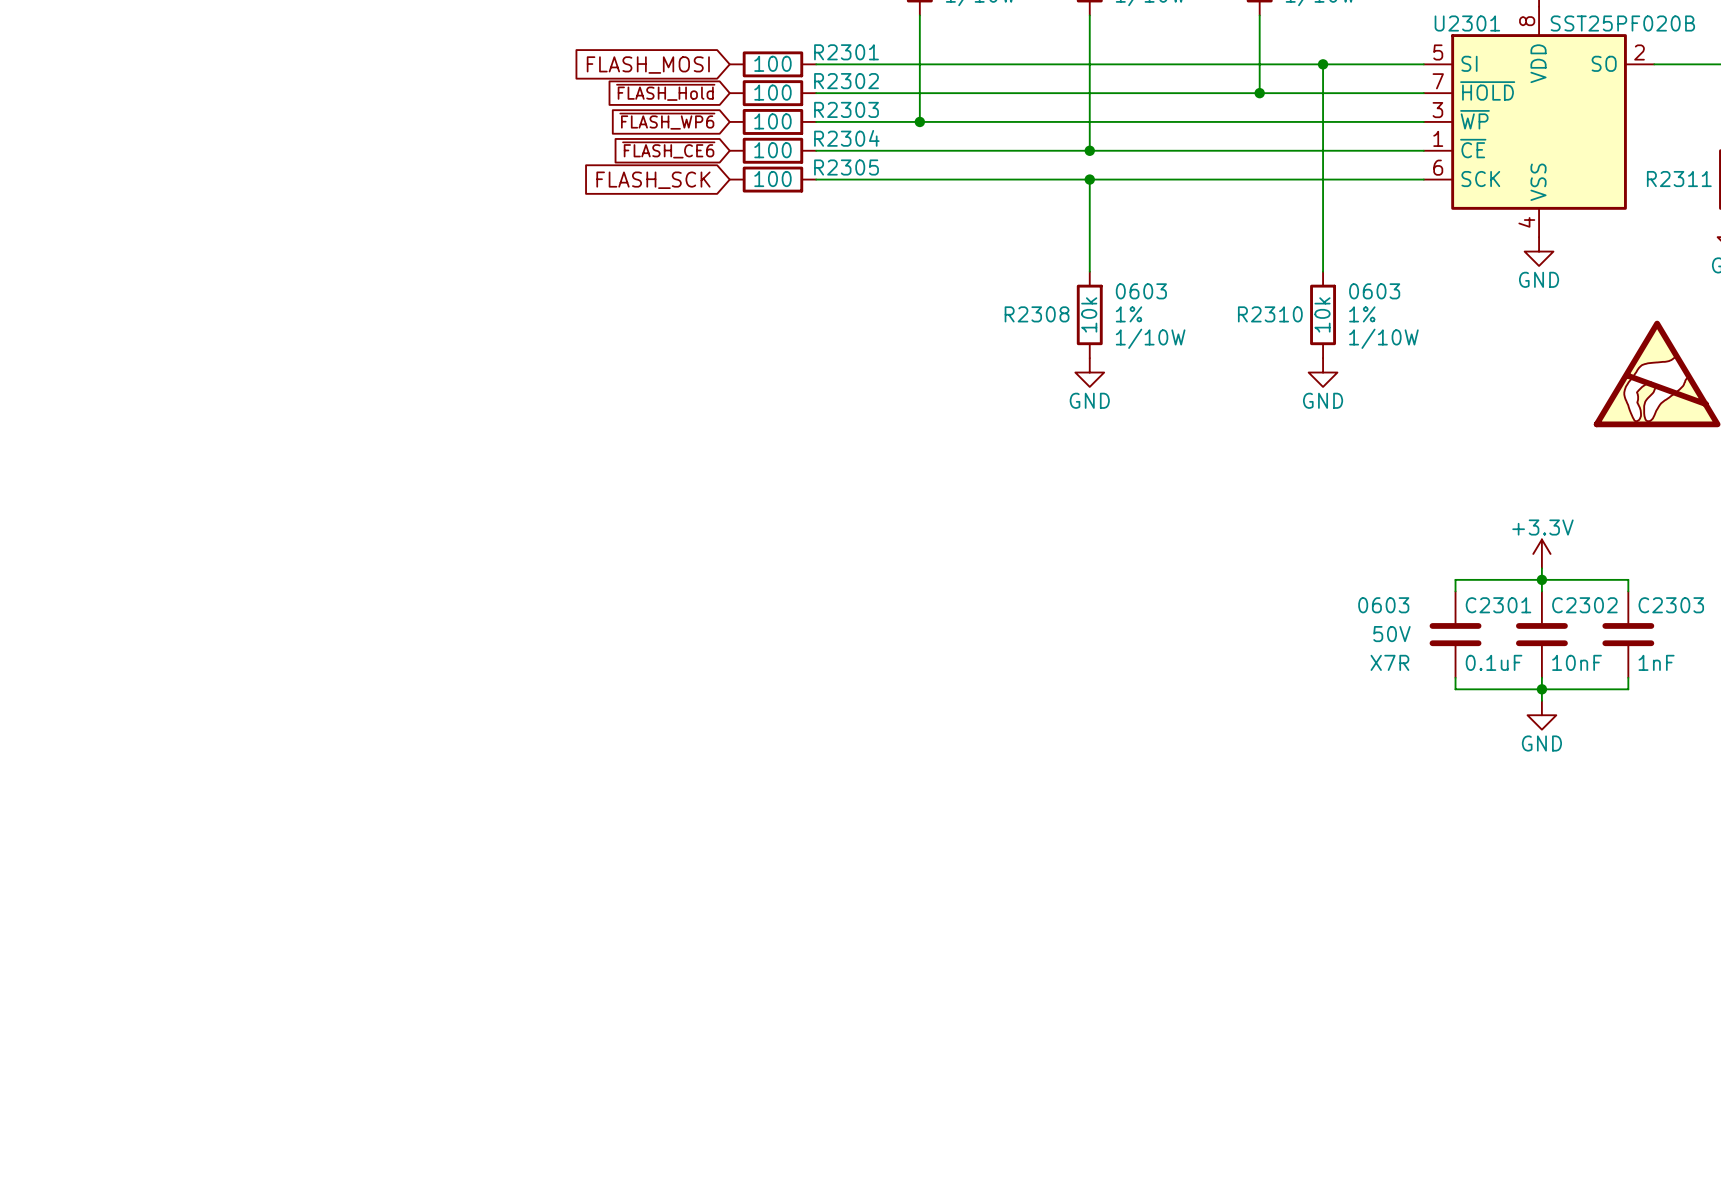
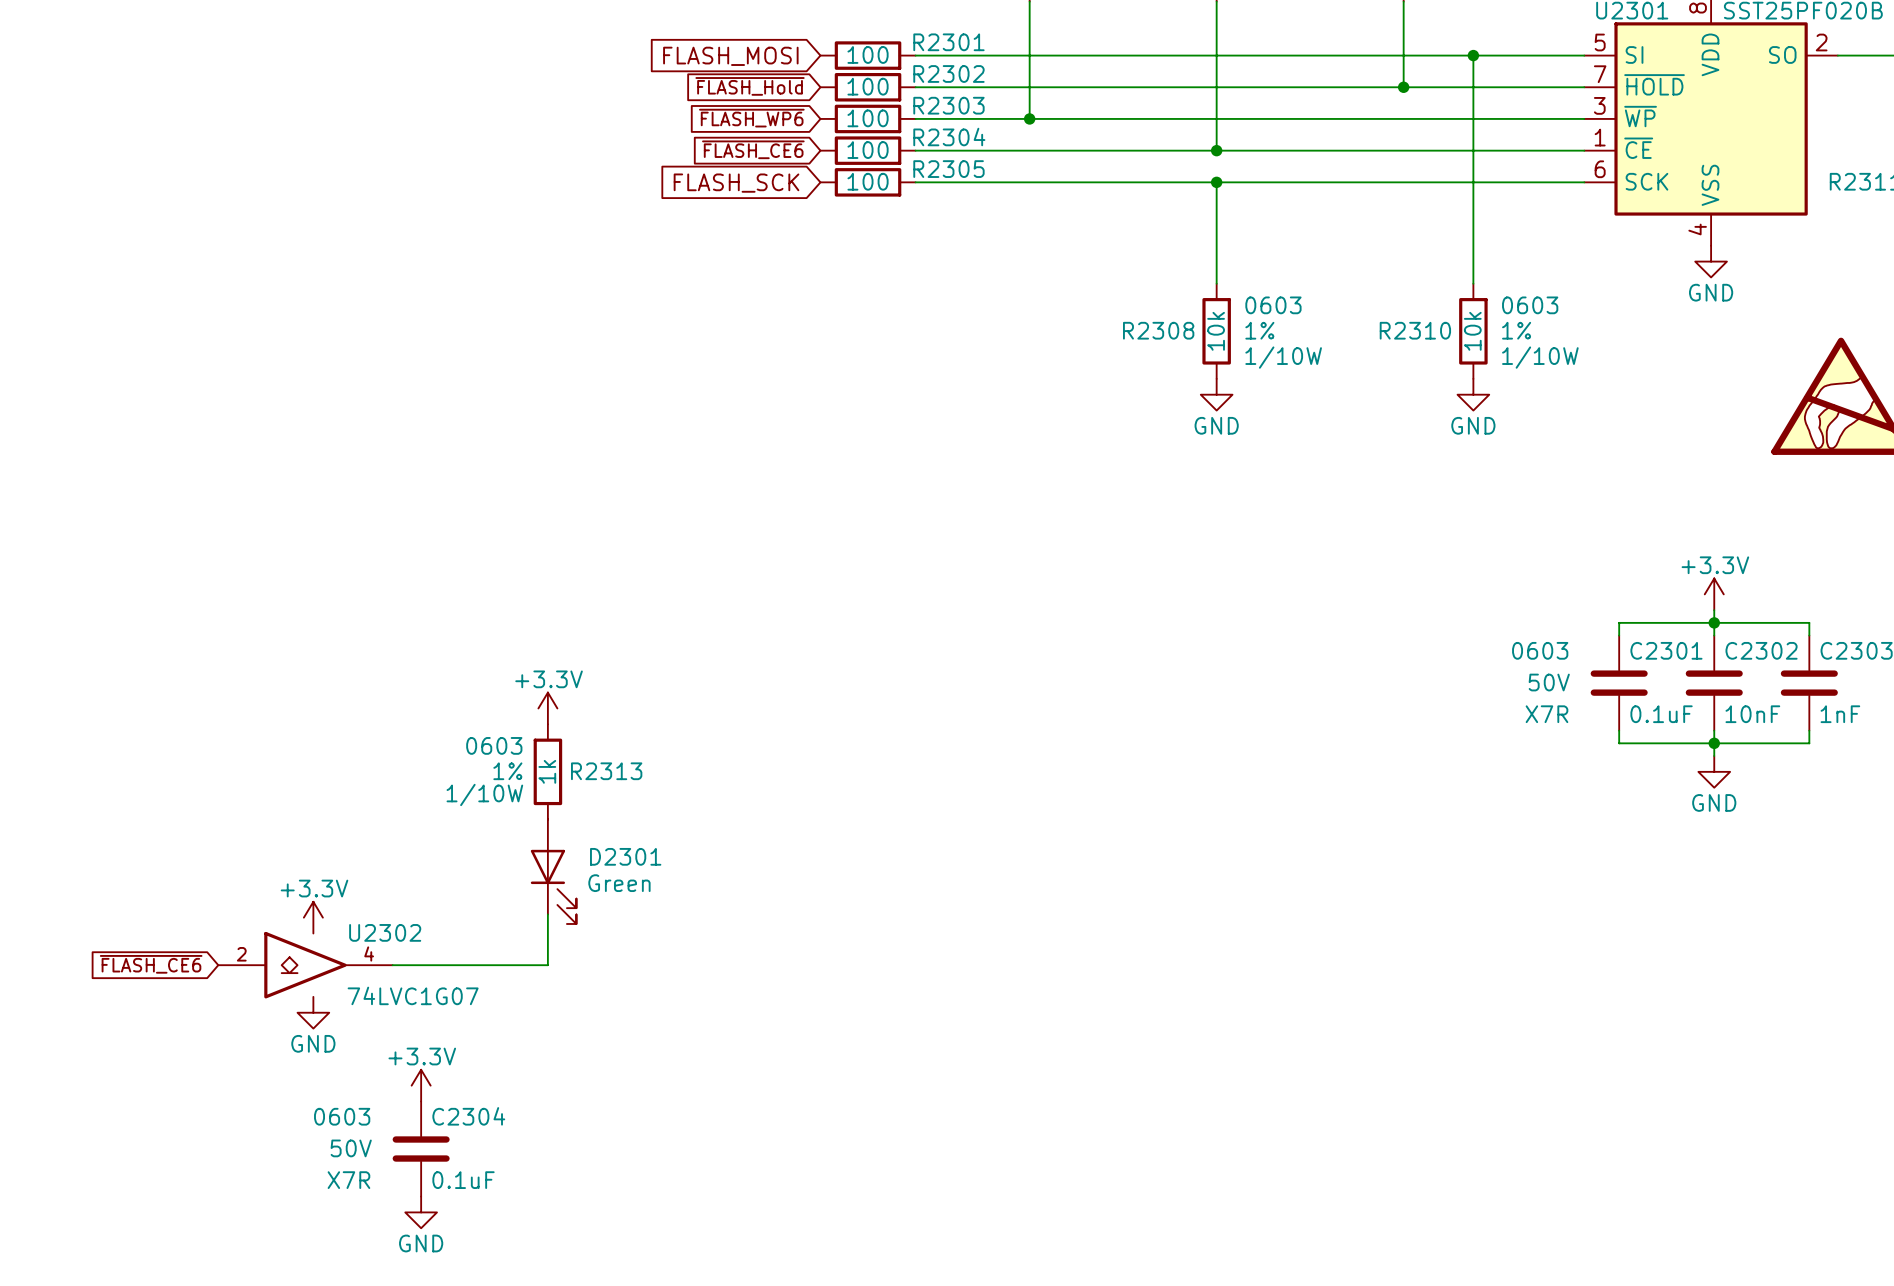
power symbol: none -> +3.3V (547, 708)
R2313: none -> 1k (547, 771)
D2301: none -> Green (553, 871)
wire: none -> (547, 914) (547, 965) (392, 965)
power symbol: none -> +3.3V (313, 917)
global label: none -> ~{FLASH_CE6} (151, 964)
U2302: none -> 74LVC1G07 (305, 965)
power symbol: none -> GND (313, 1012)
power symbol: none -> +3.3V (421, 1085)
C2304: none -> 0.1uF (421, 1149)
power symbol: none -> GND (421, 1212)

